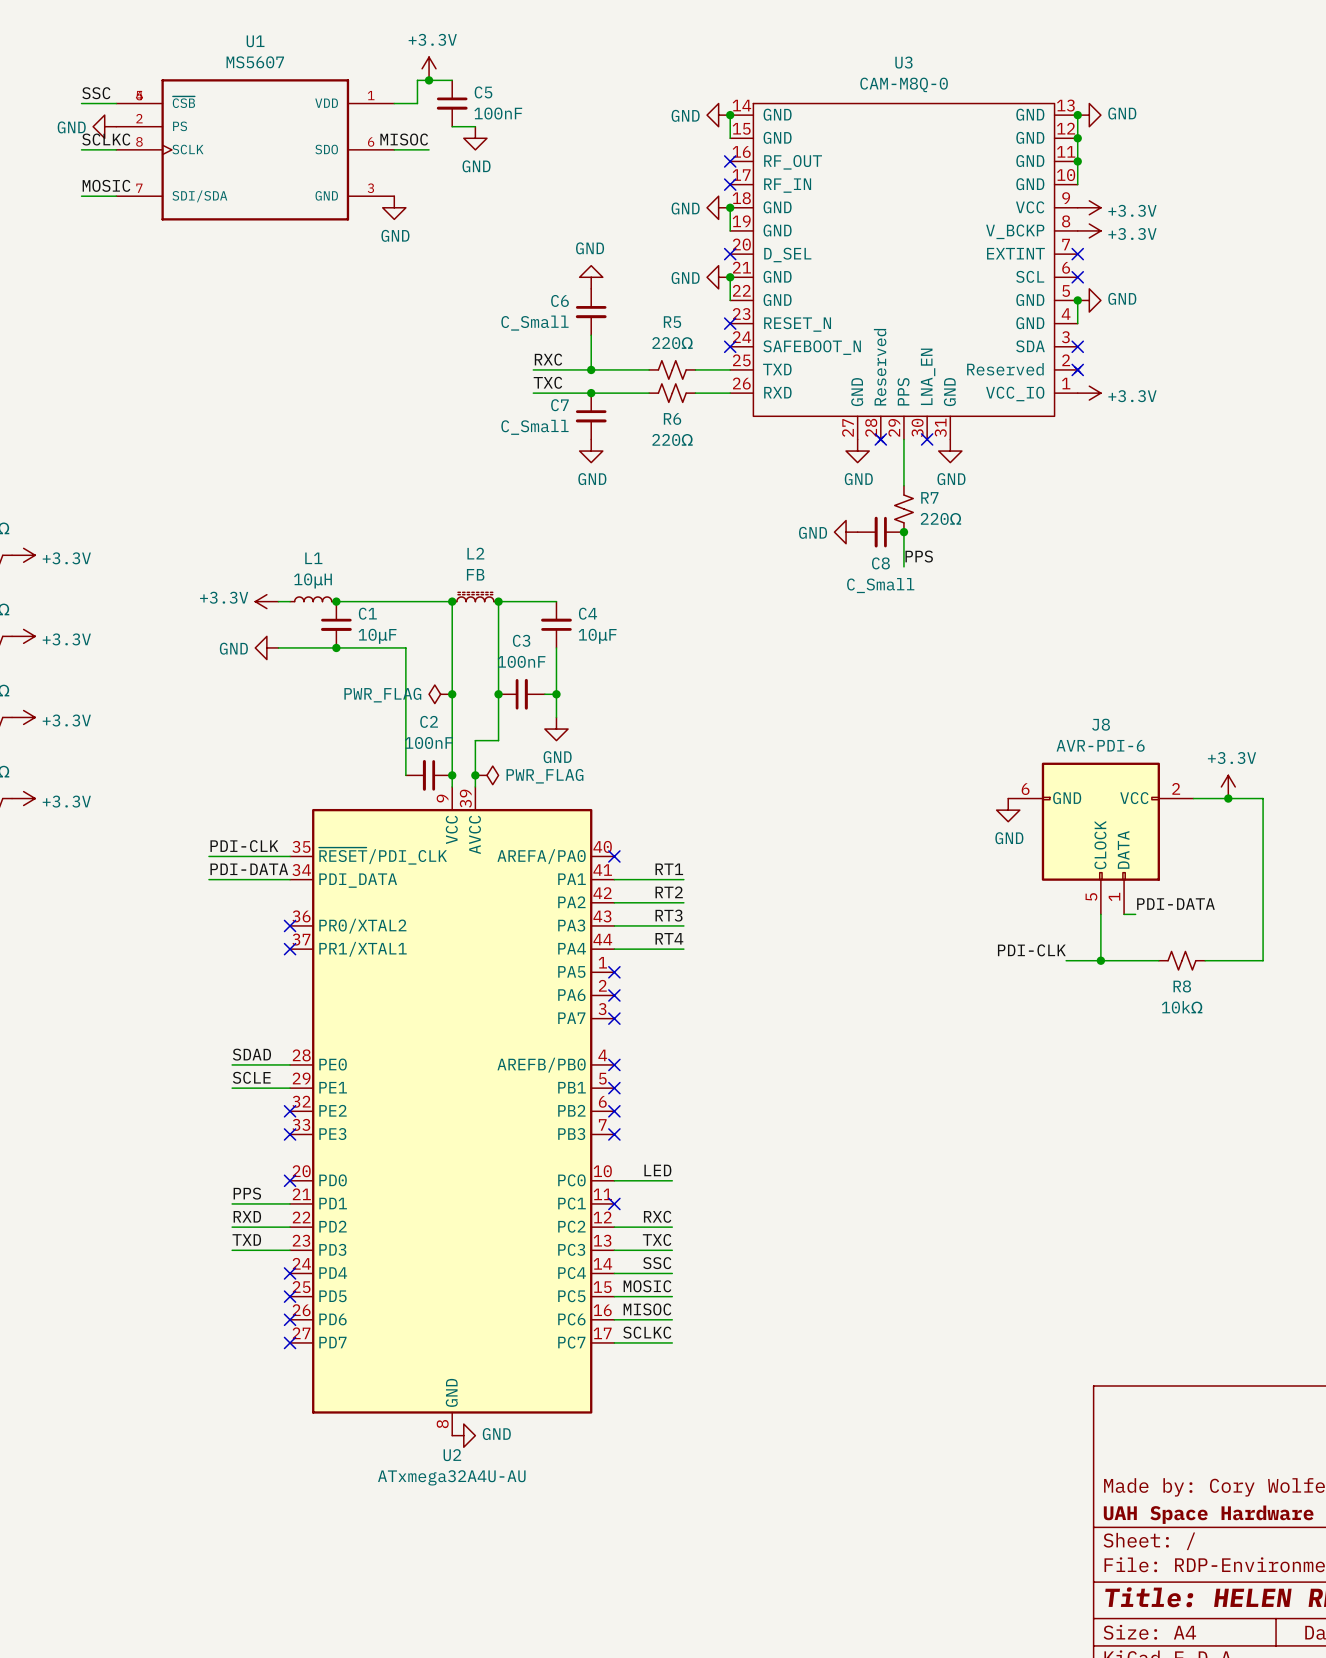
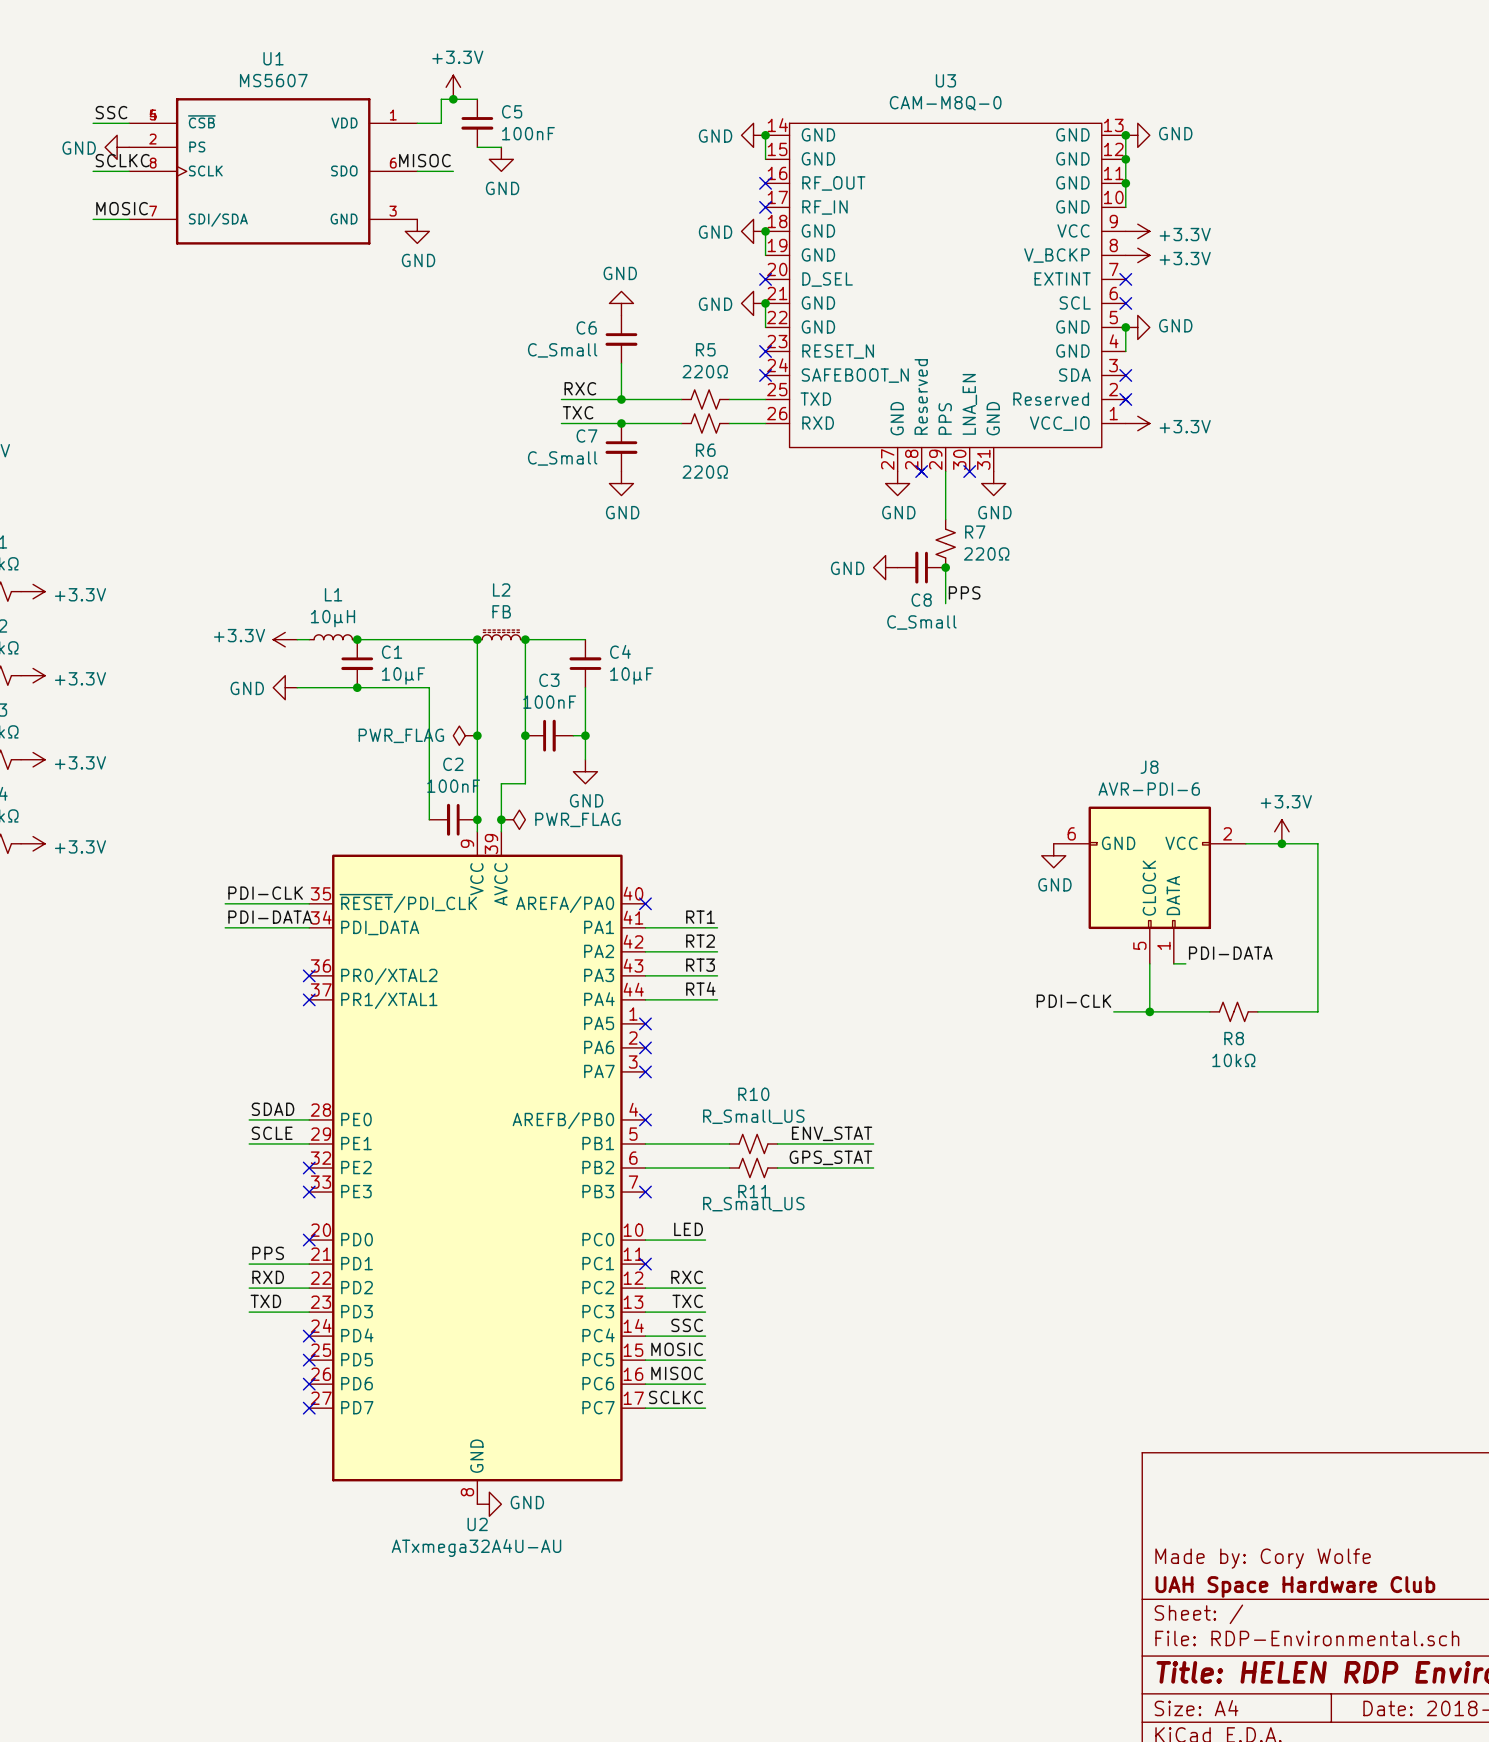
label: none -> ENV_STAT (832, 1133)
wire: none -> (645, 1143) (729, 1143)
no-connect mark: (614, 1088) -> none
R10: none -> R_Small_US (753, 1143)
wire: none -> (777, 1143) (873, 1143)
label: none -> GPS_STAT (830, 1157)
wire: none -> (645, 1168) (729, 1168)
no-connect mark: (614, 1111) -> none
R11: none -> R_Small_US (753, 1168)
wire: none -> (777, 1168) (873, 1168)

